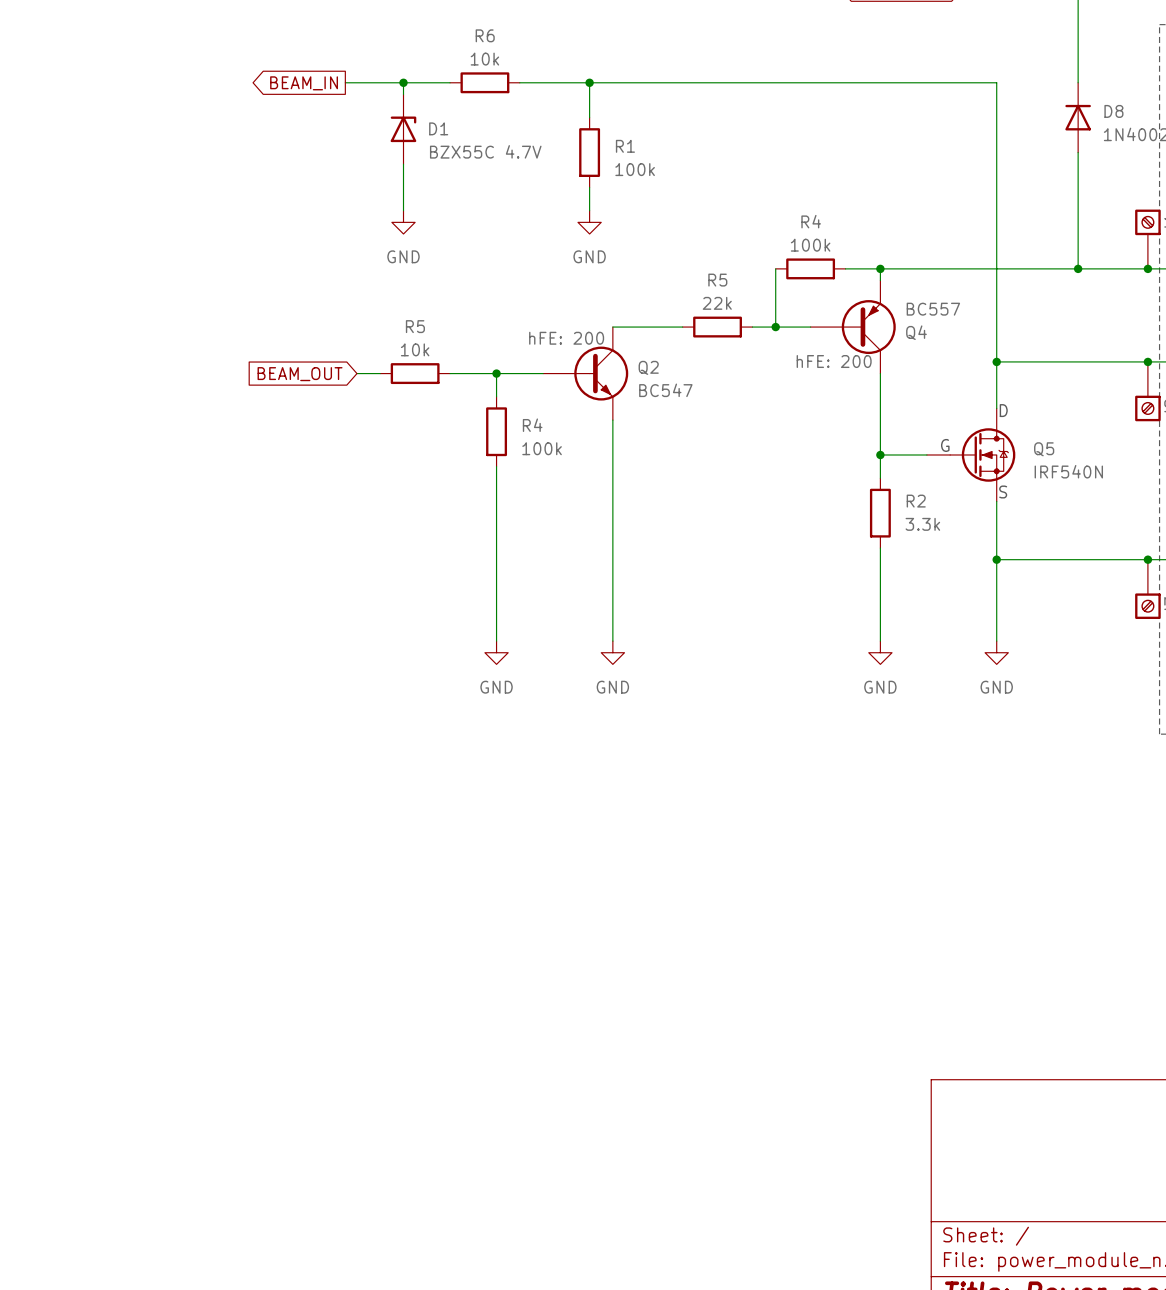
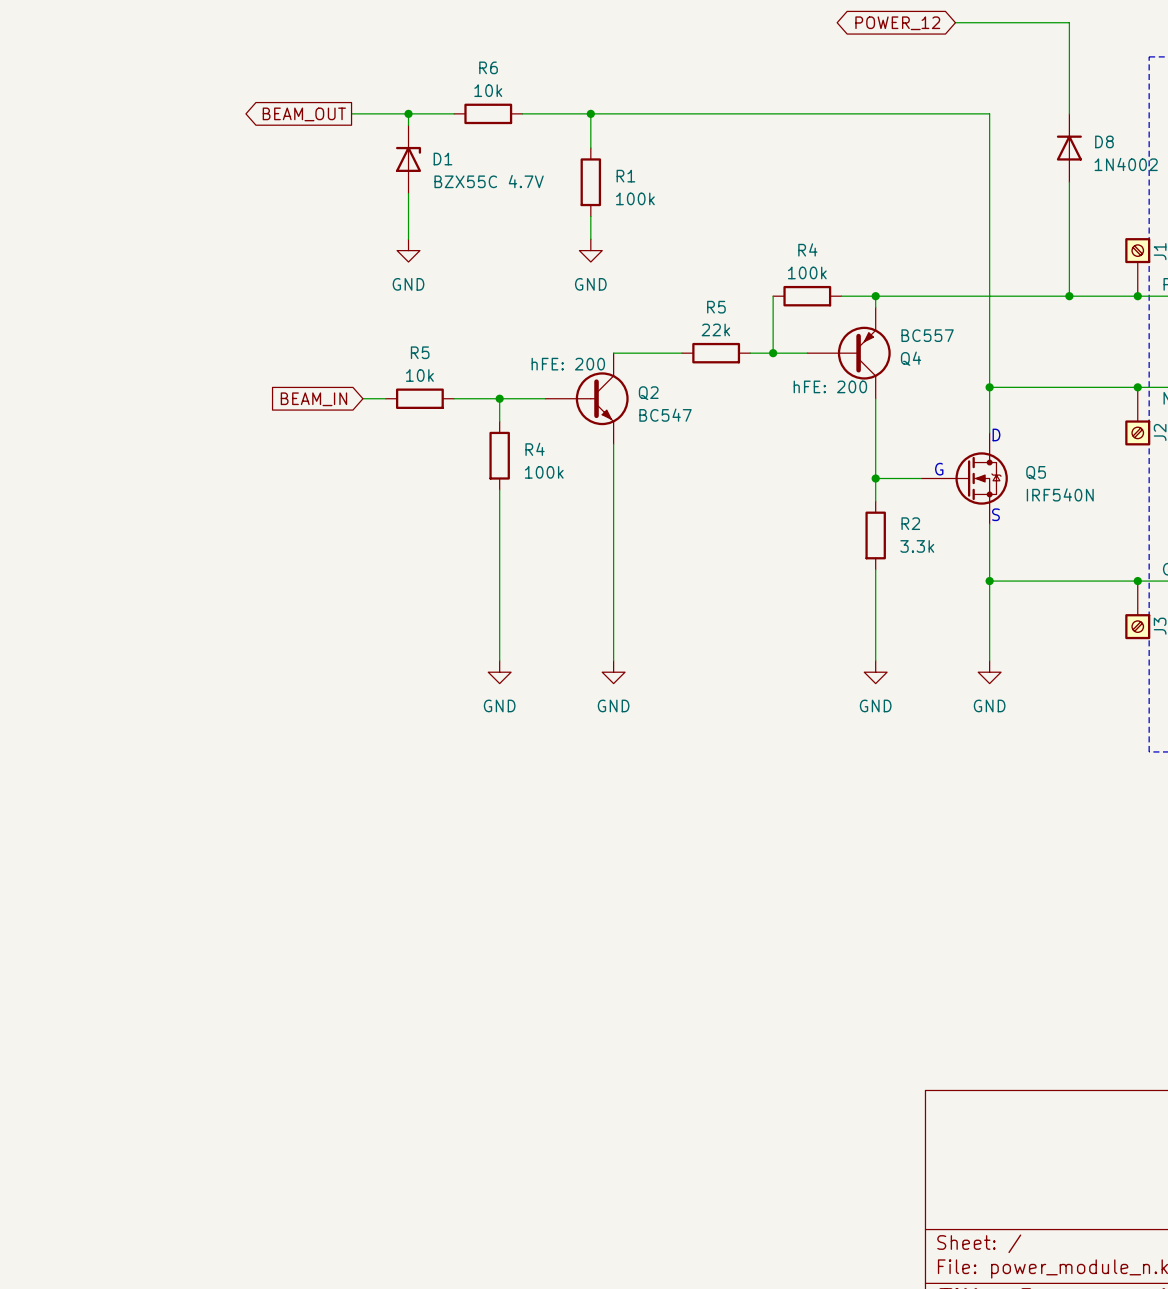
global label: BEAM_IN (304, 83) -> BEAM_OUT (304, 114)
global label: BEAM_OUT (300, 374) -> BEAM_IN (313, 399)

